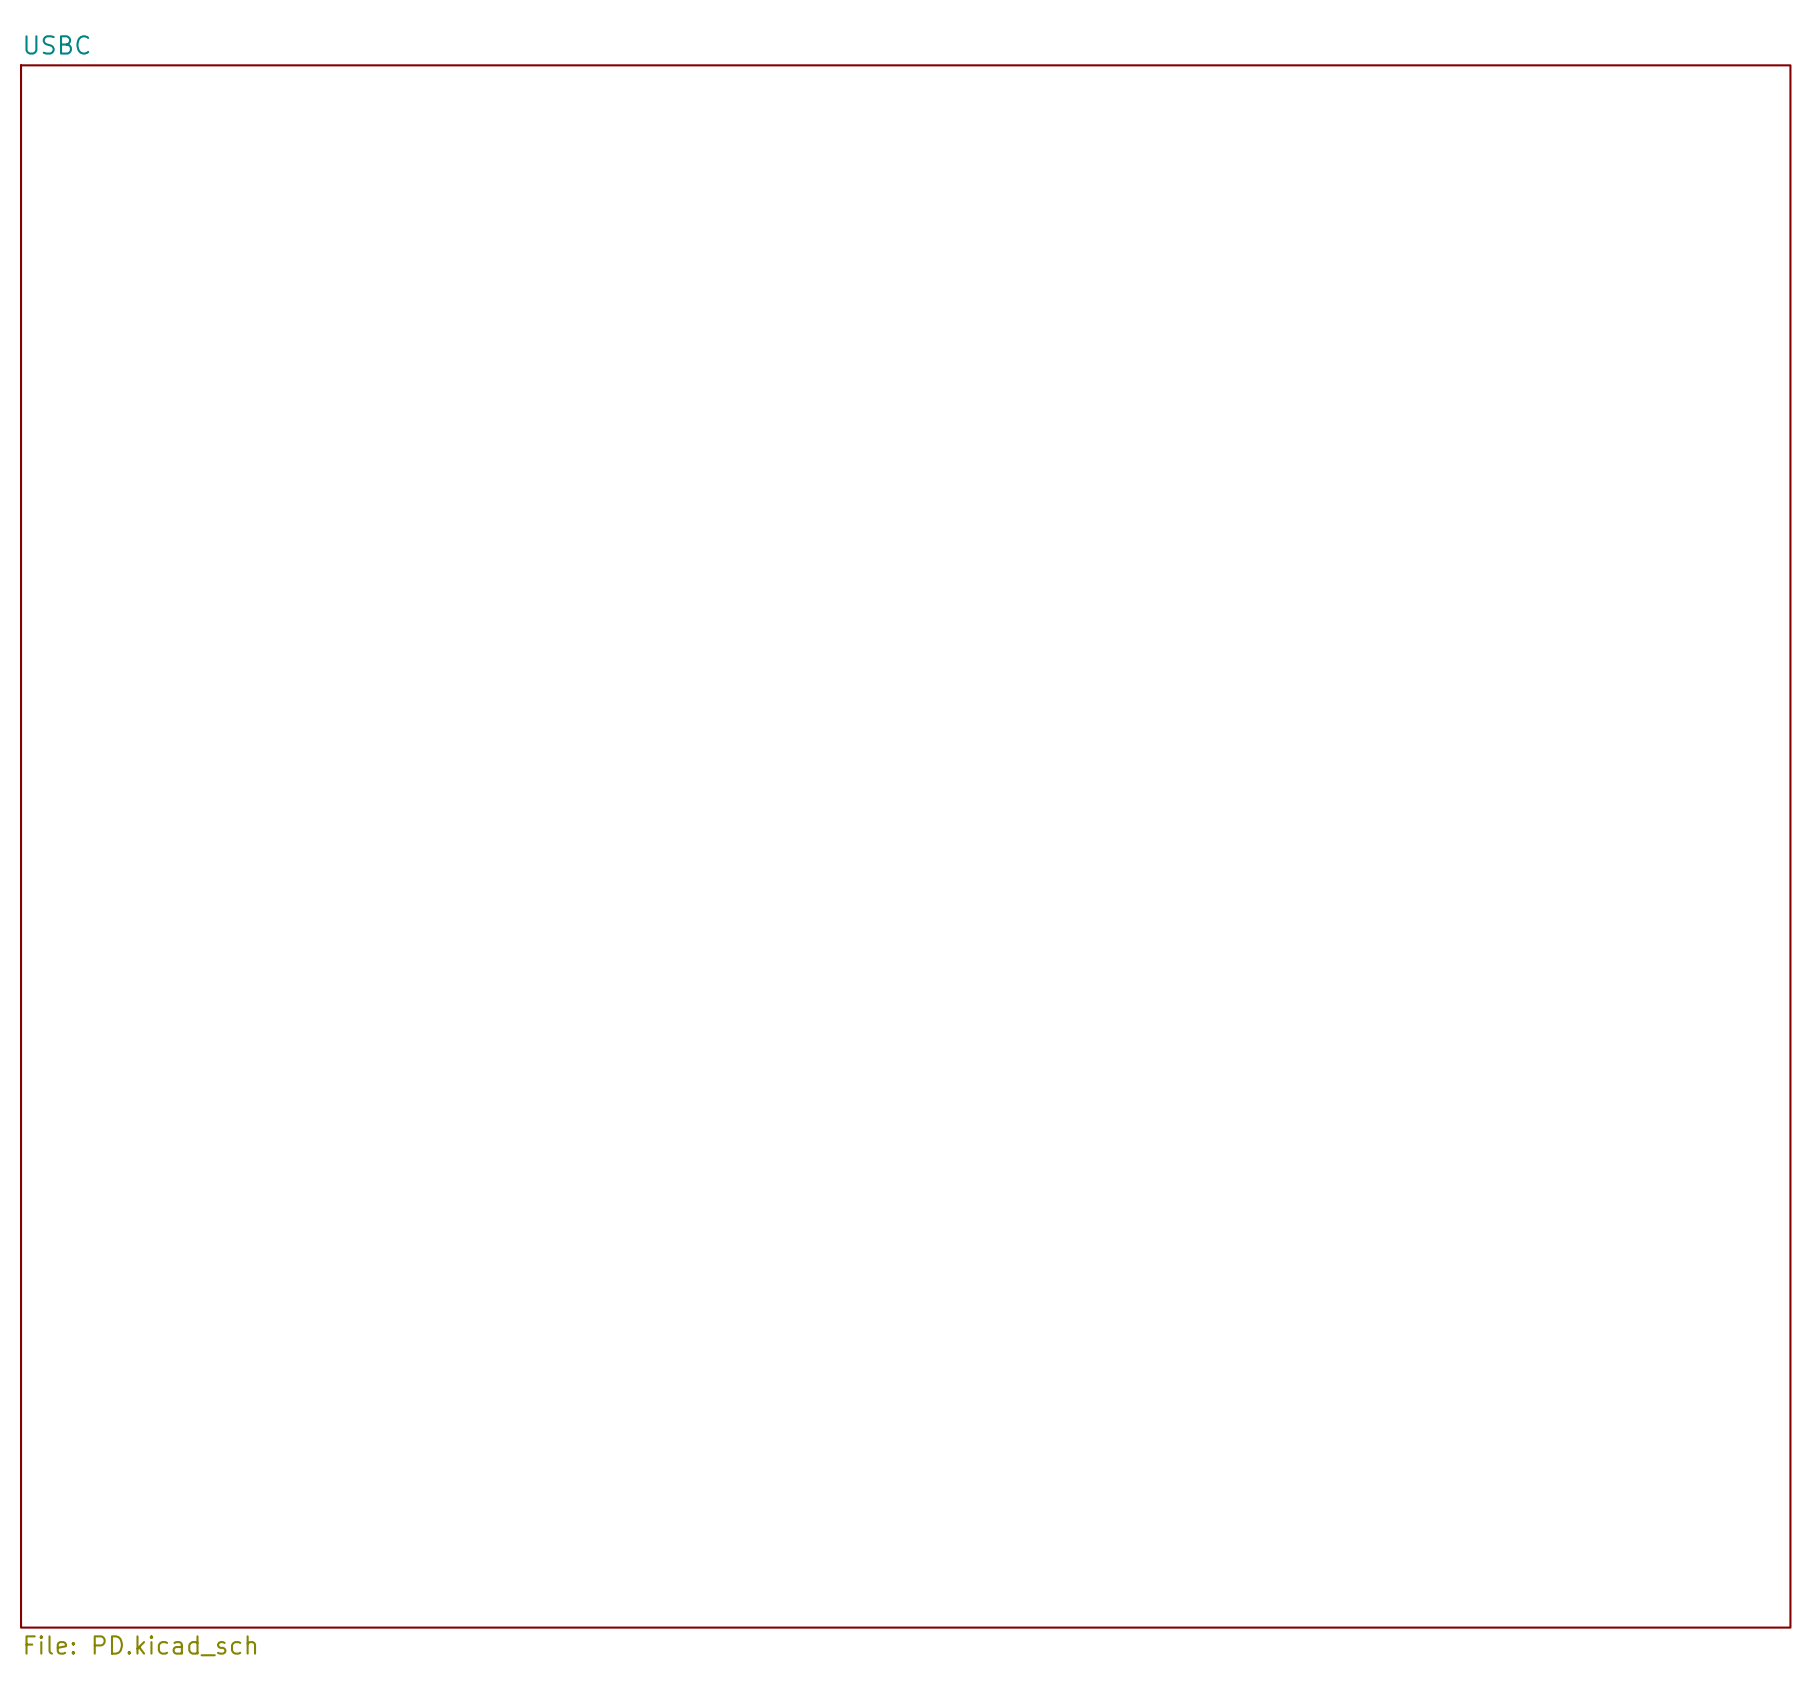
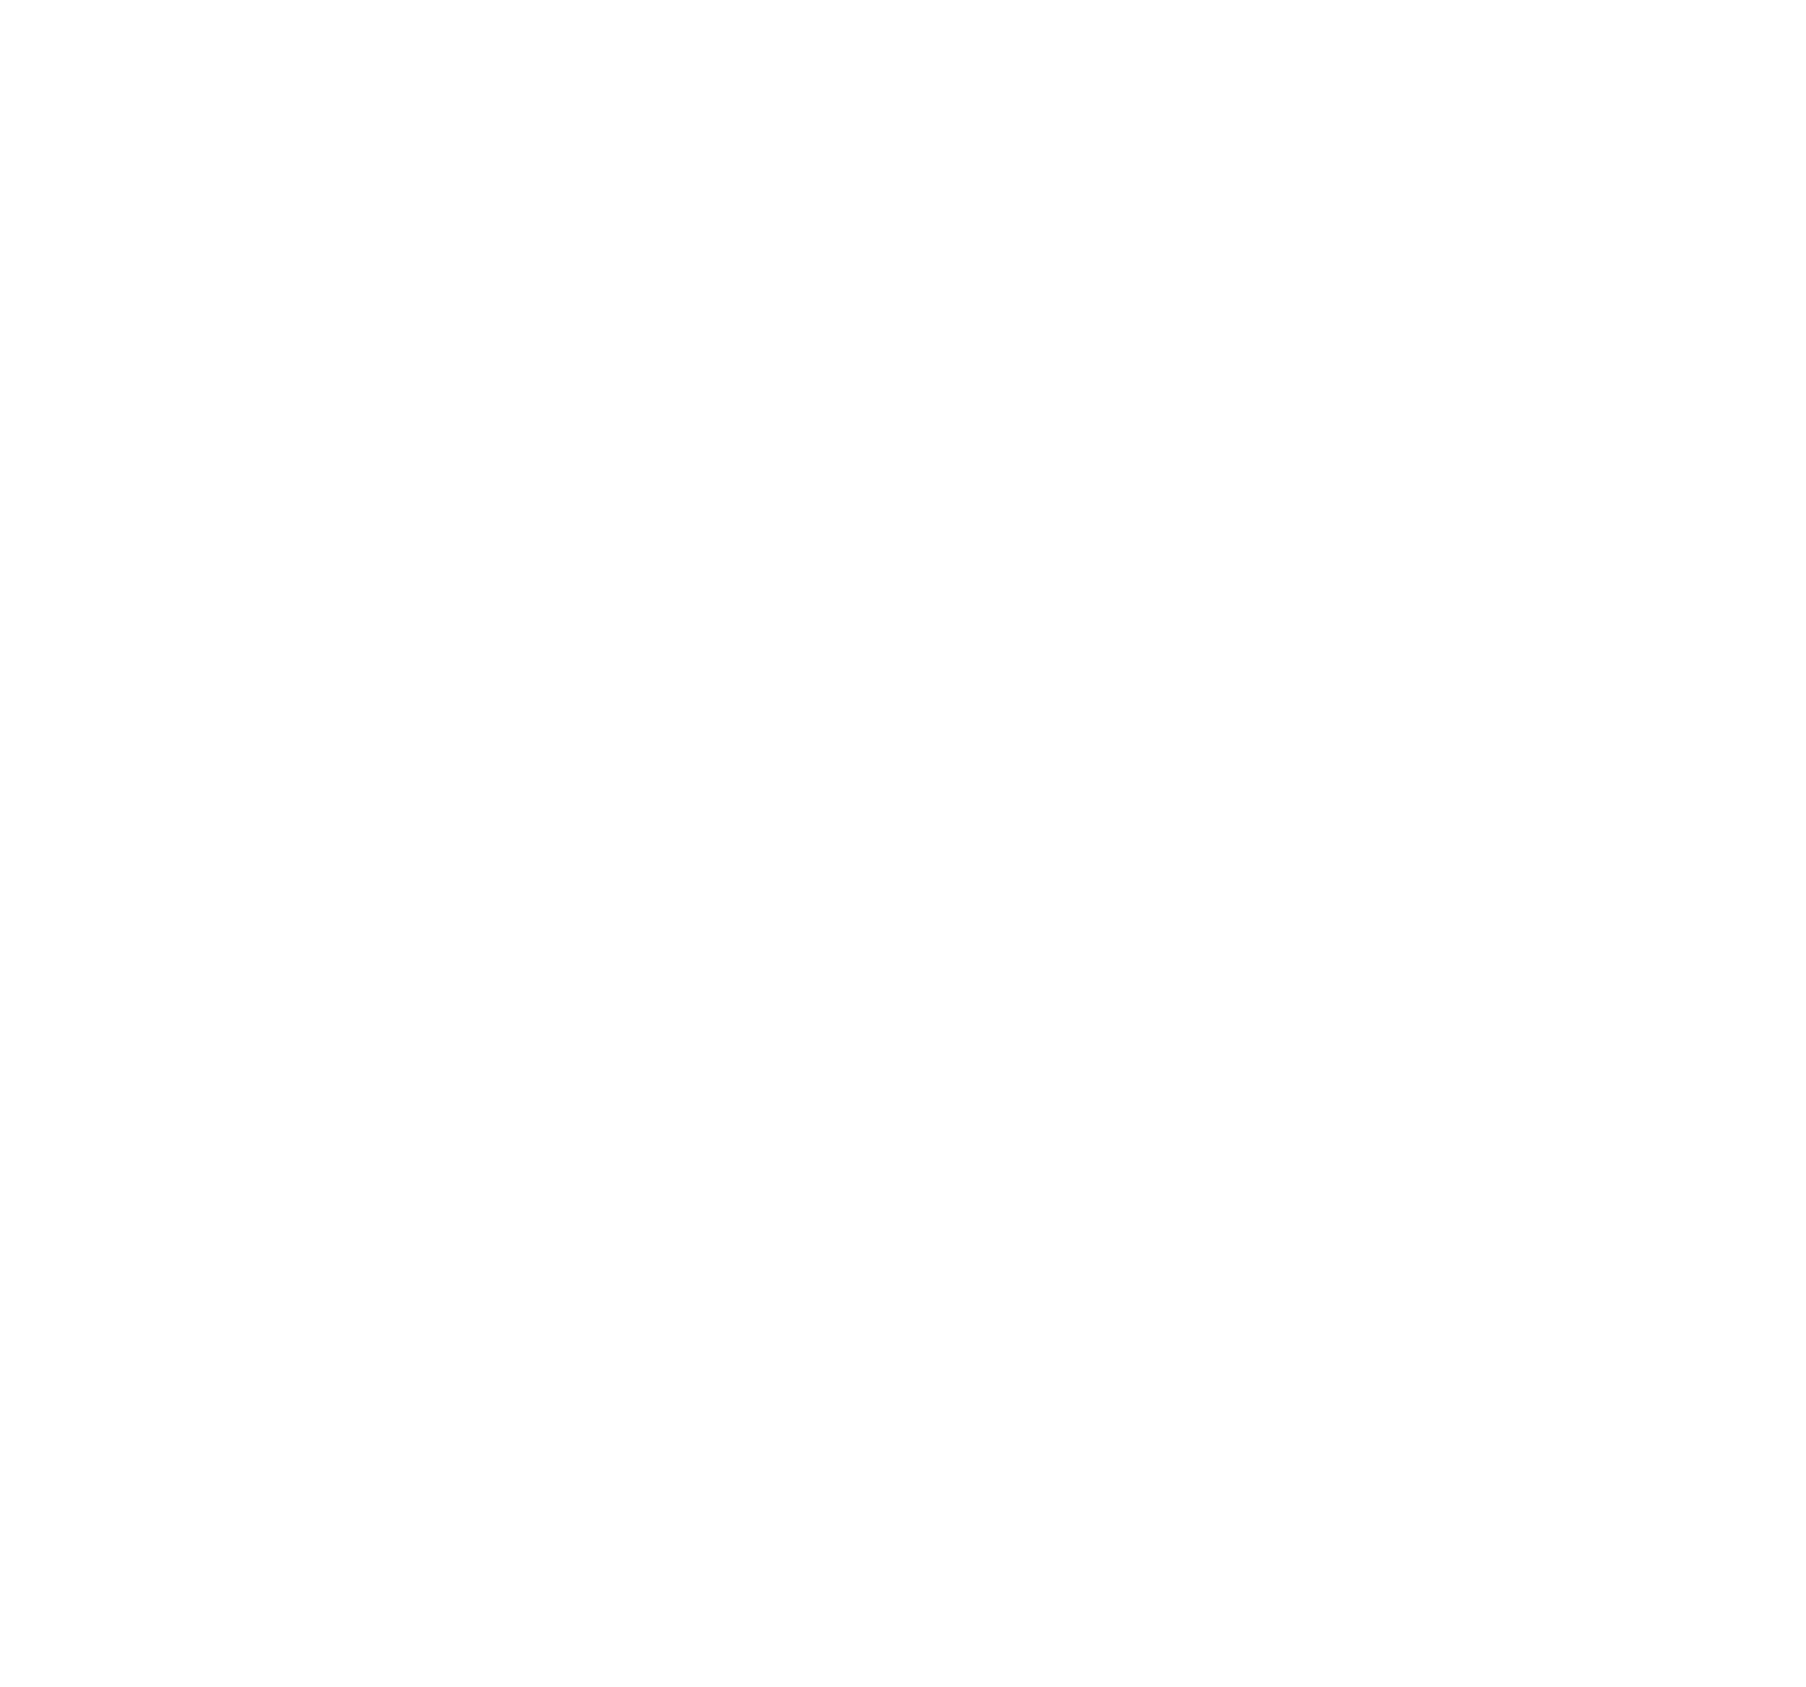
sheet USBC: File: PD.kicad_sch (905, 846) -> none

